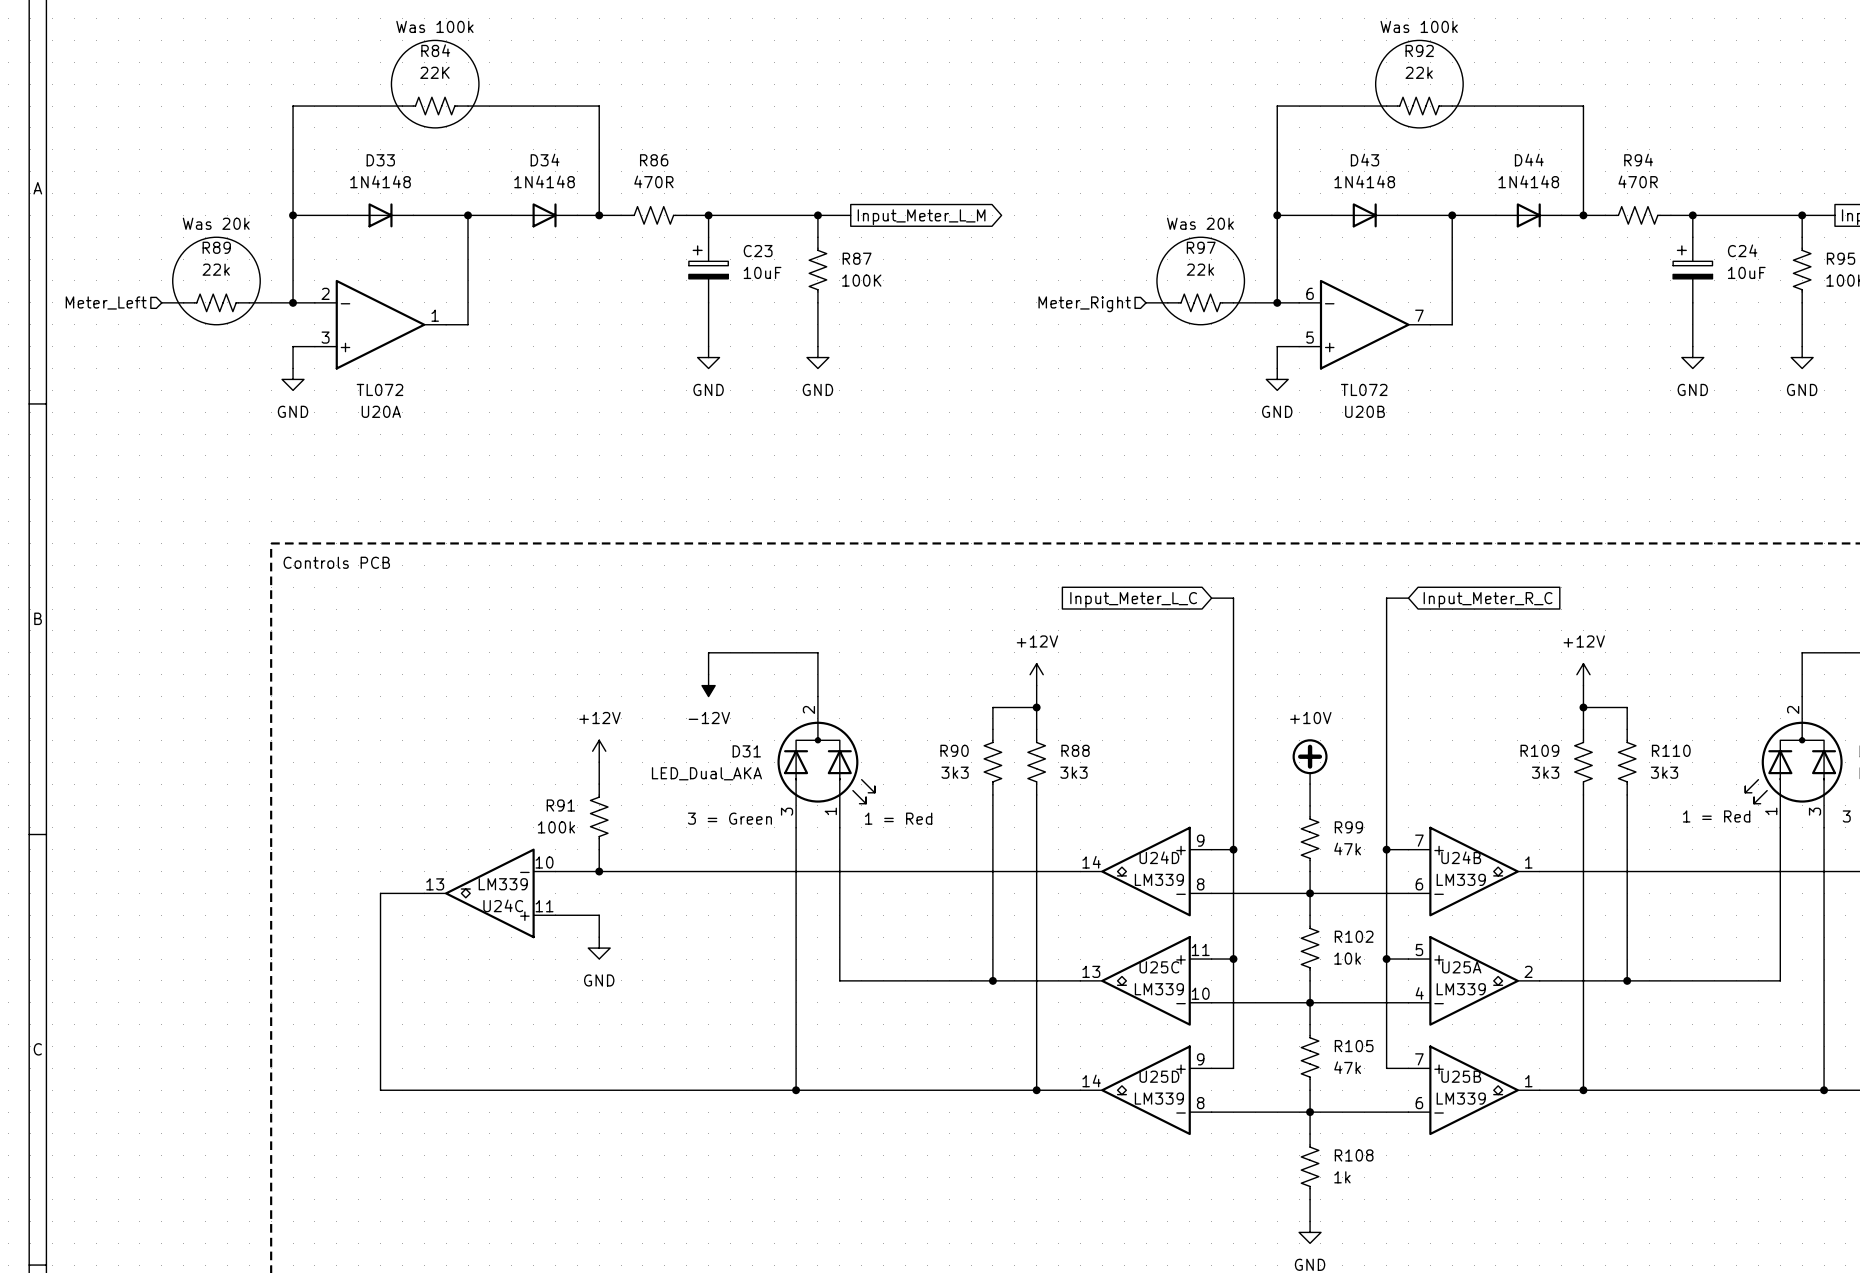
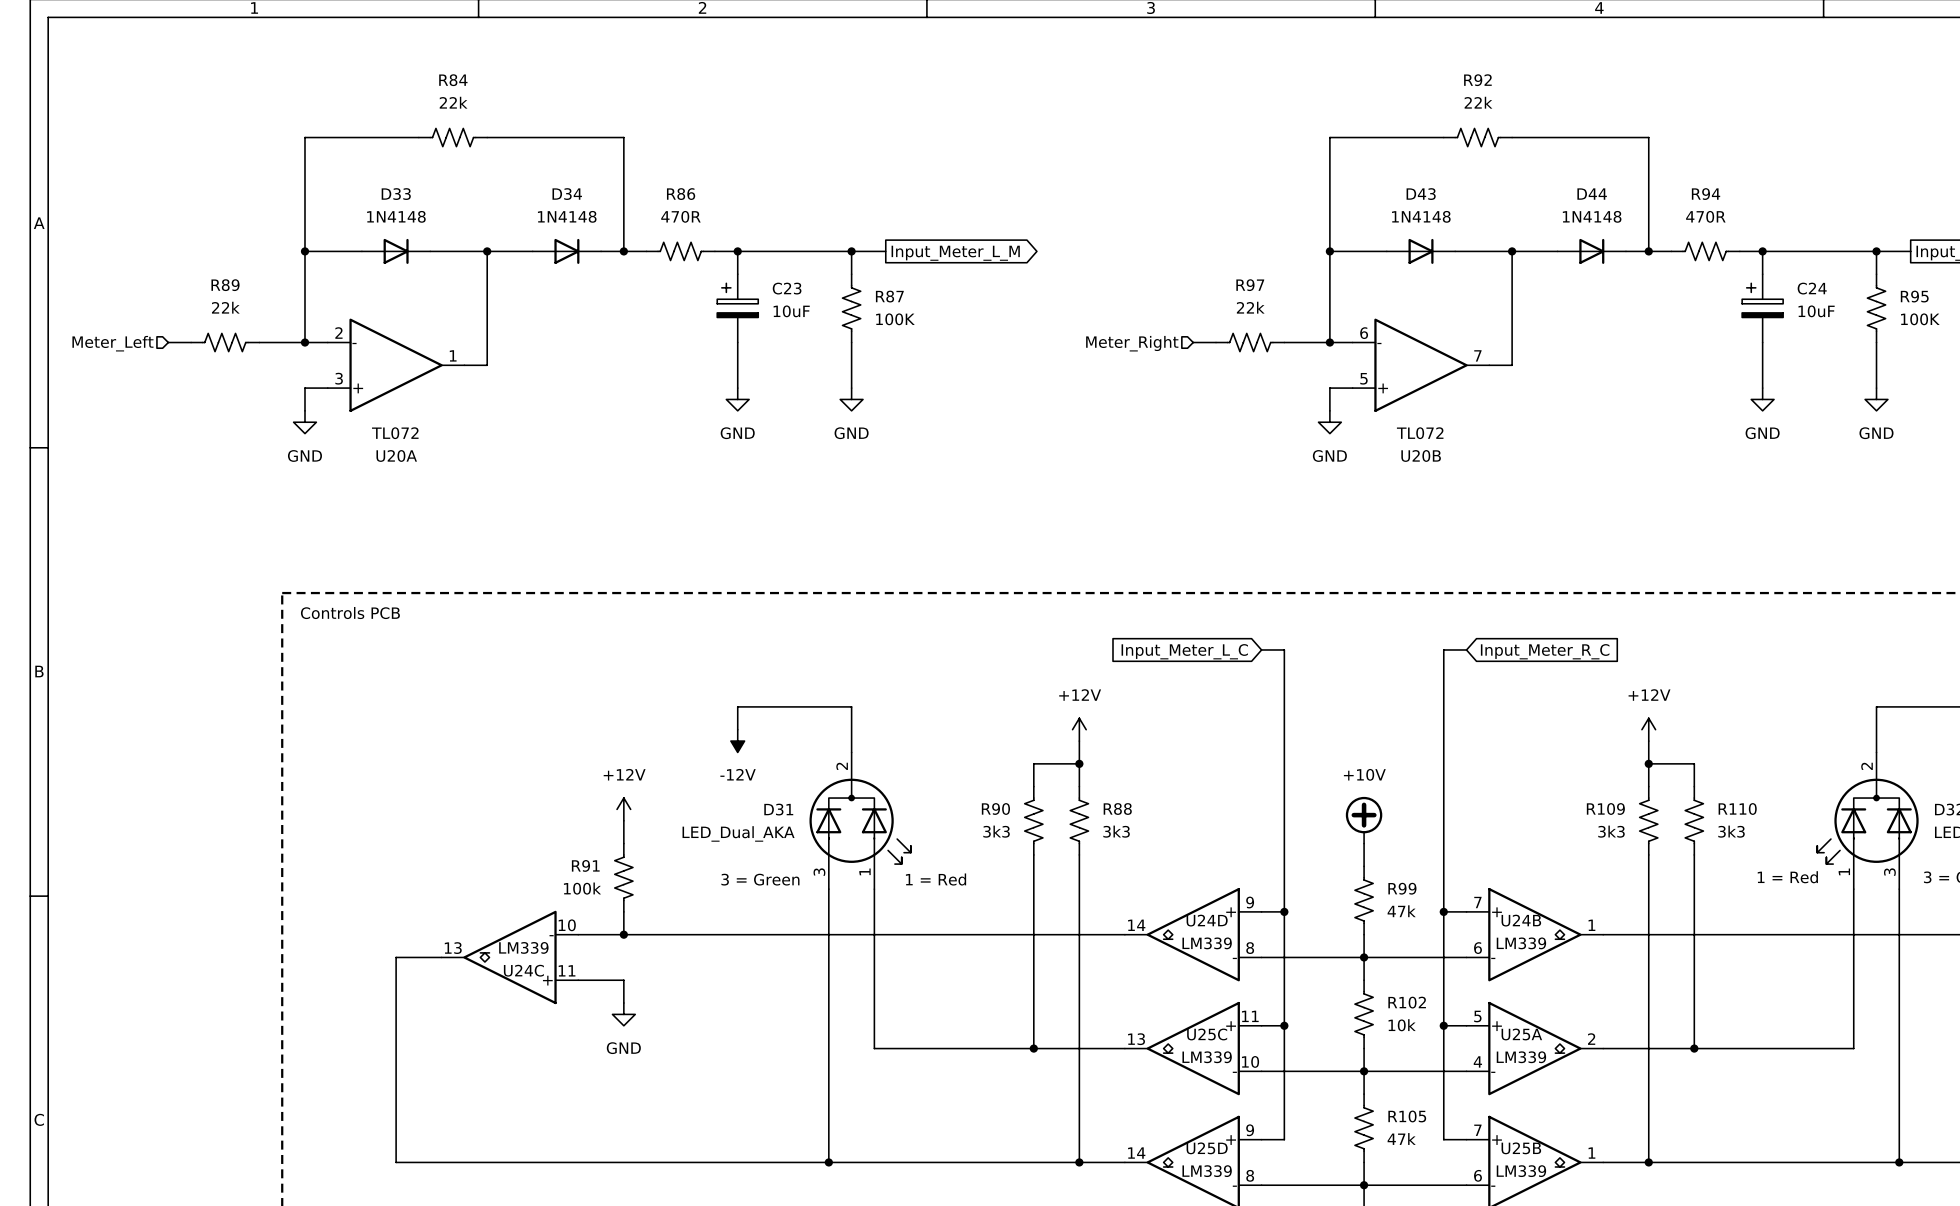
text: Was 100k (434, 26) -> none
text: Was 100k (1419, 26) -> none
drawing: [391, 40, 479, 128] -> none
drawing: [1375, 40, 1464, 128] -> none
R84 value: 22K (434, 72) -> 22k (453, 102)
text: Was 20k (216, 223) -> none
text: Was 20k (1200, 223) -> none
drawing: [172, 237, 261, 325] -> none
drawing: [1156, 237, 1245, 325] -> none

